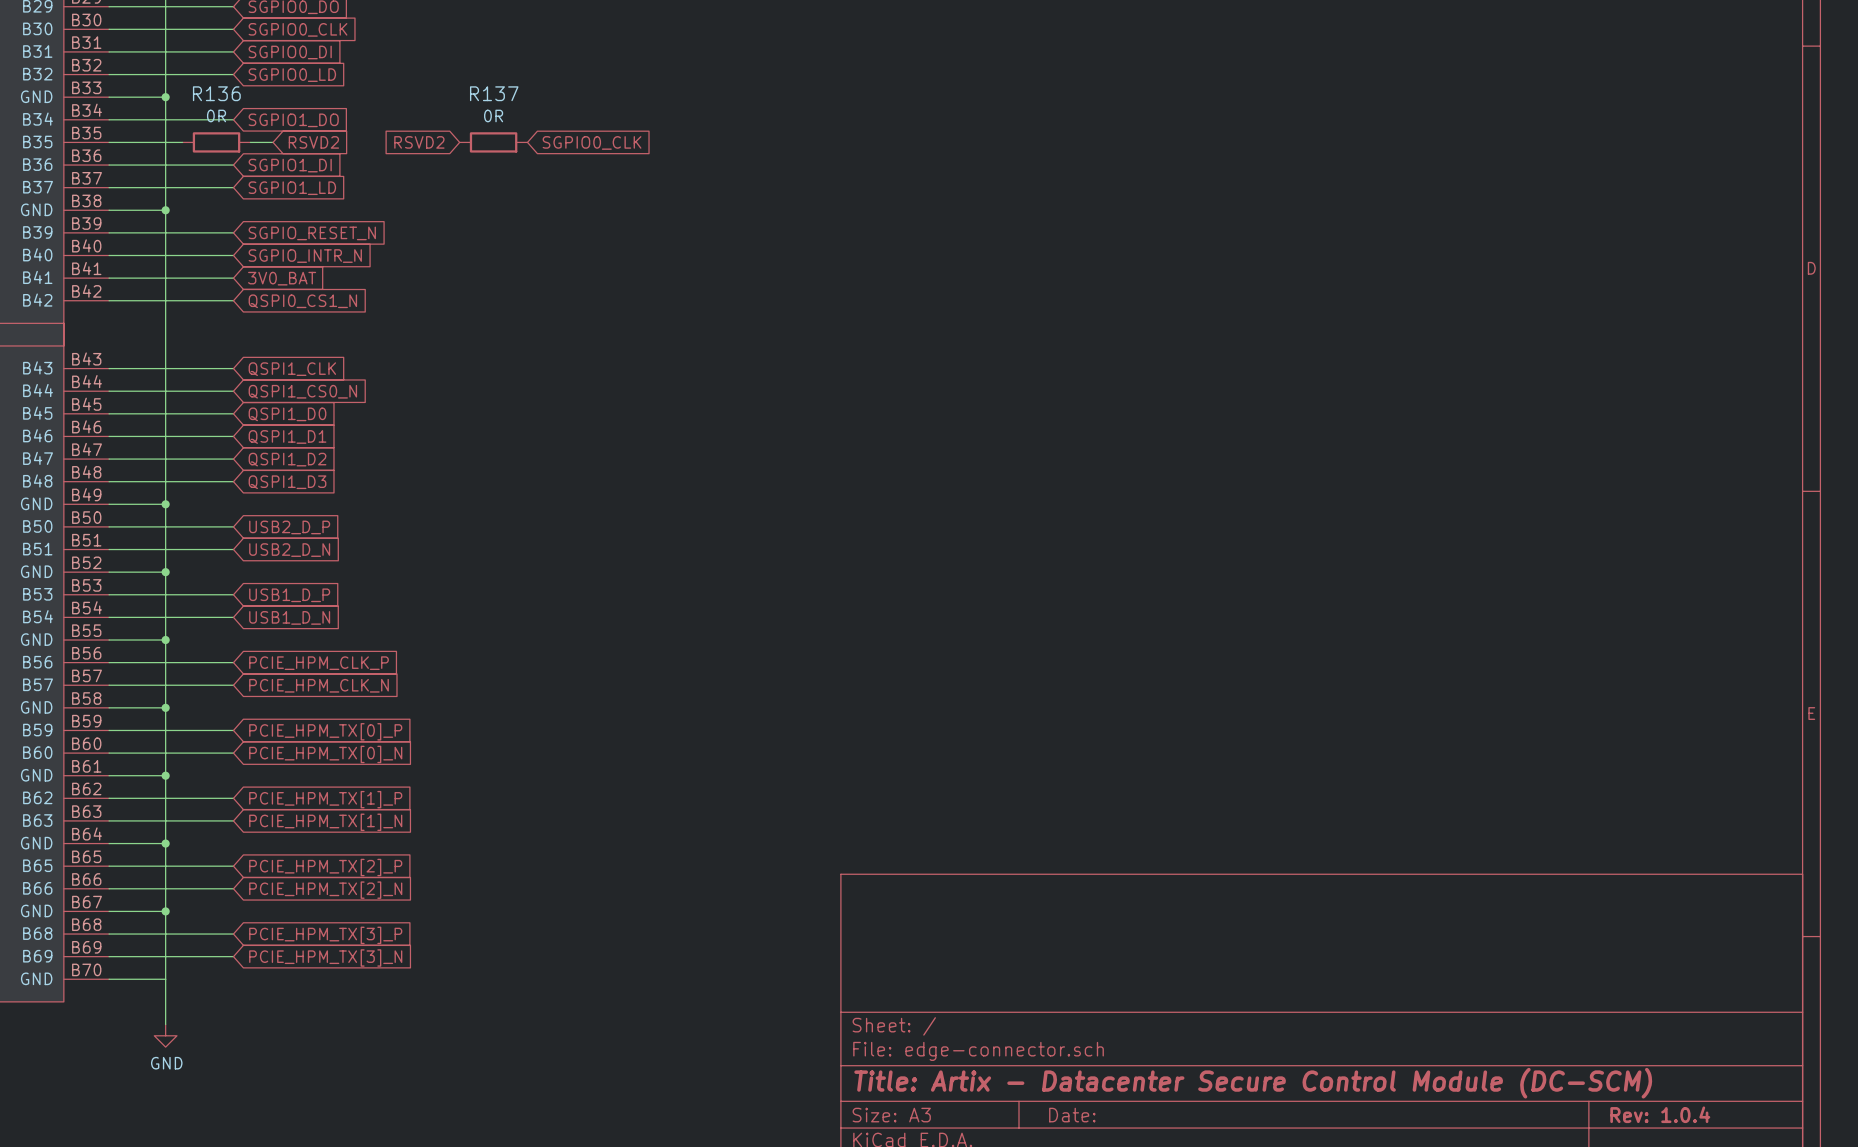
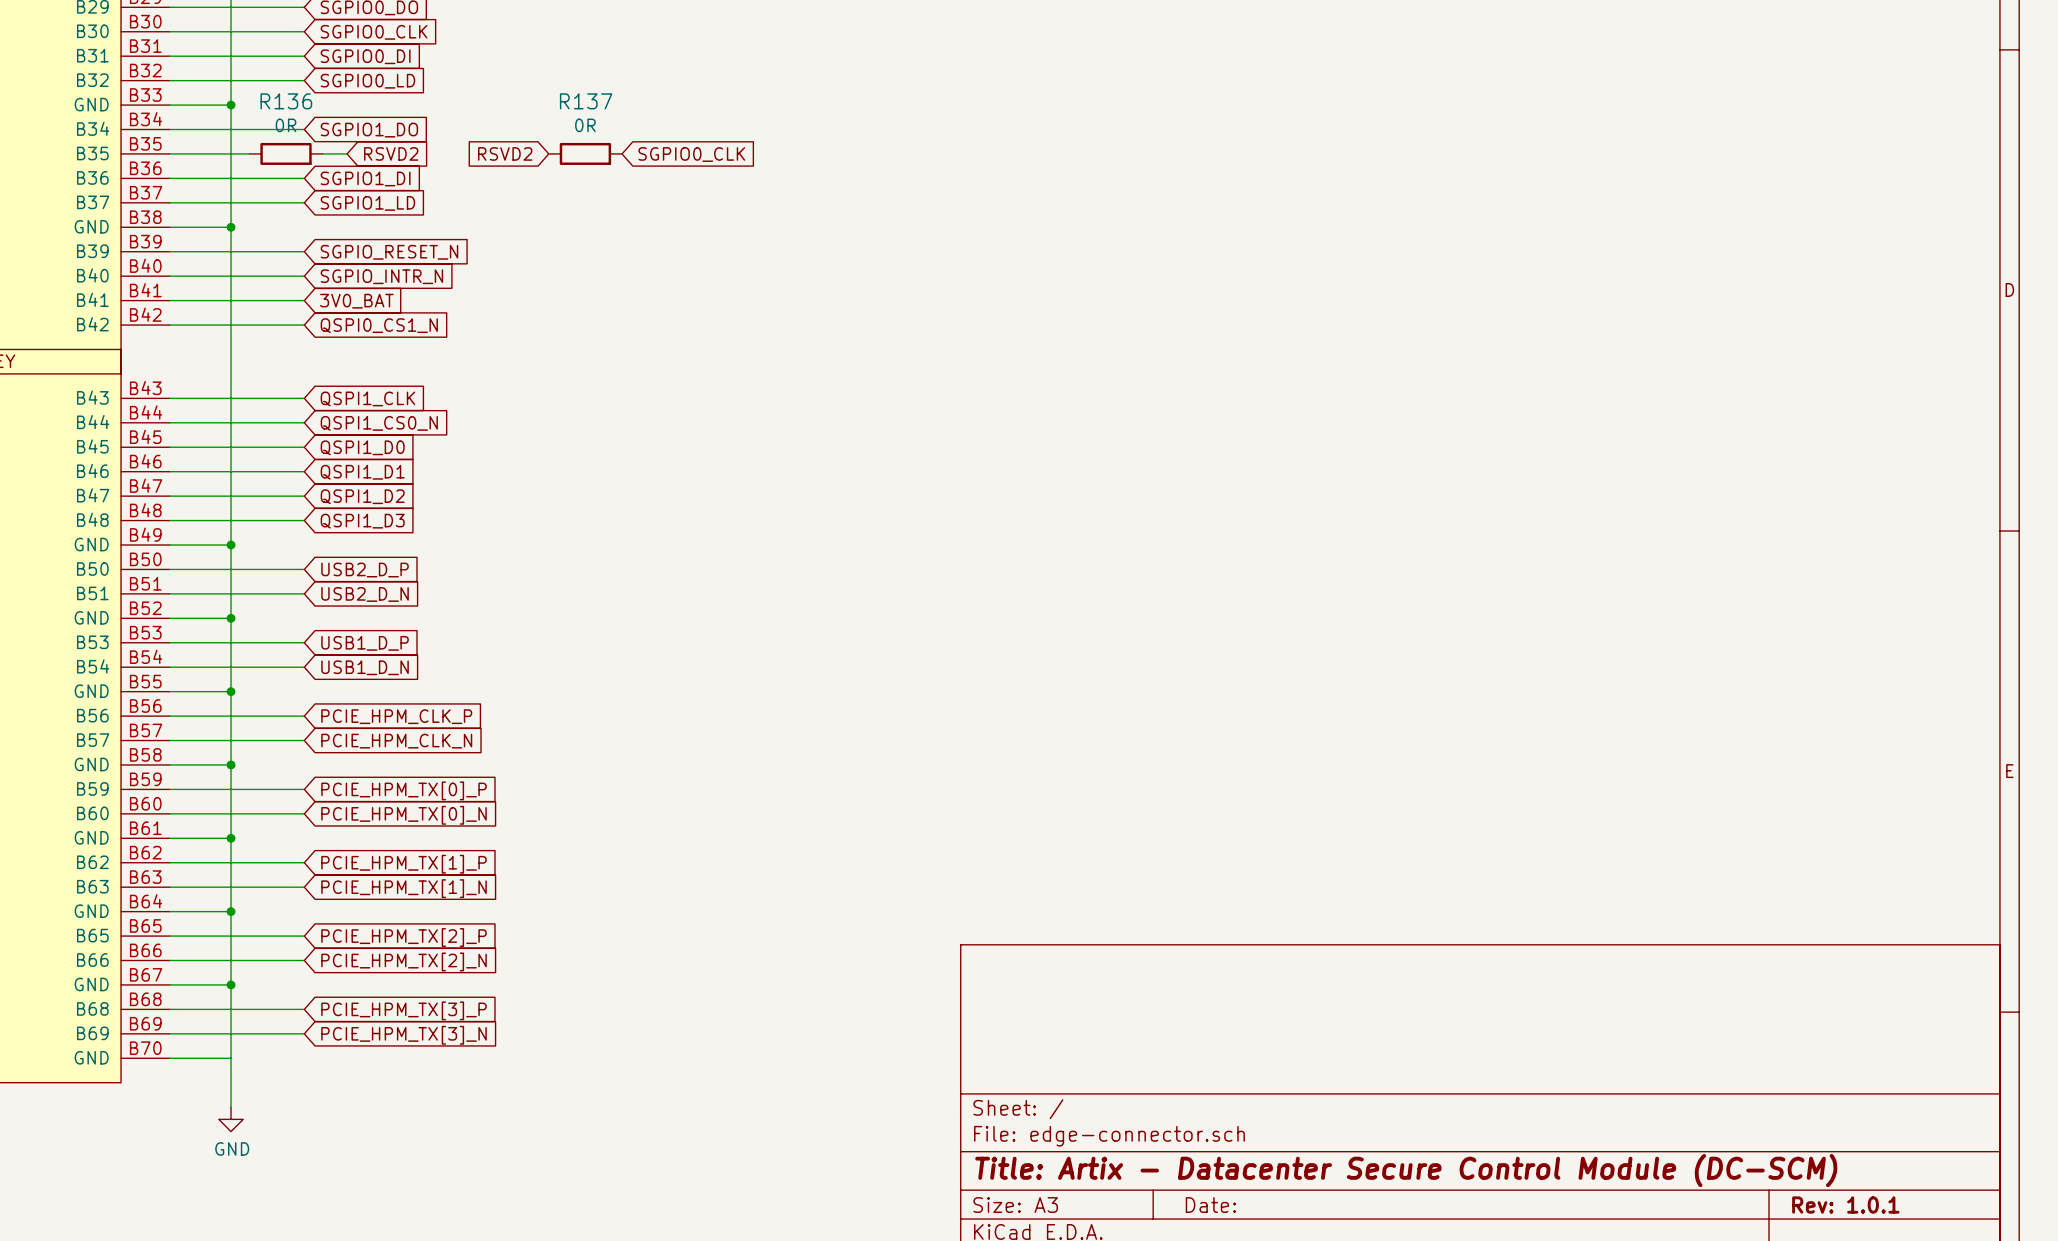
title block: Rev: 1.0.4 (1660, 1114) -> Rev: 1.0.1 (1845, 1205)

